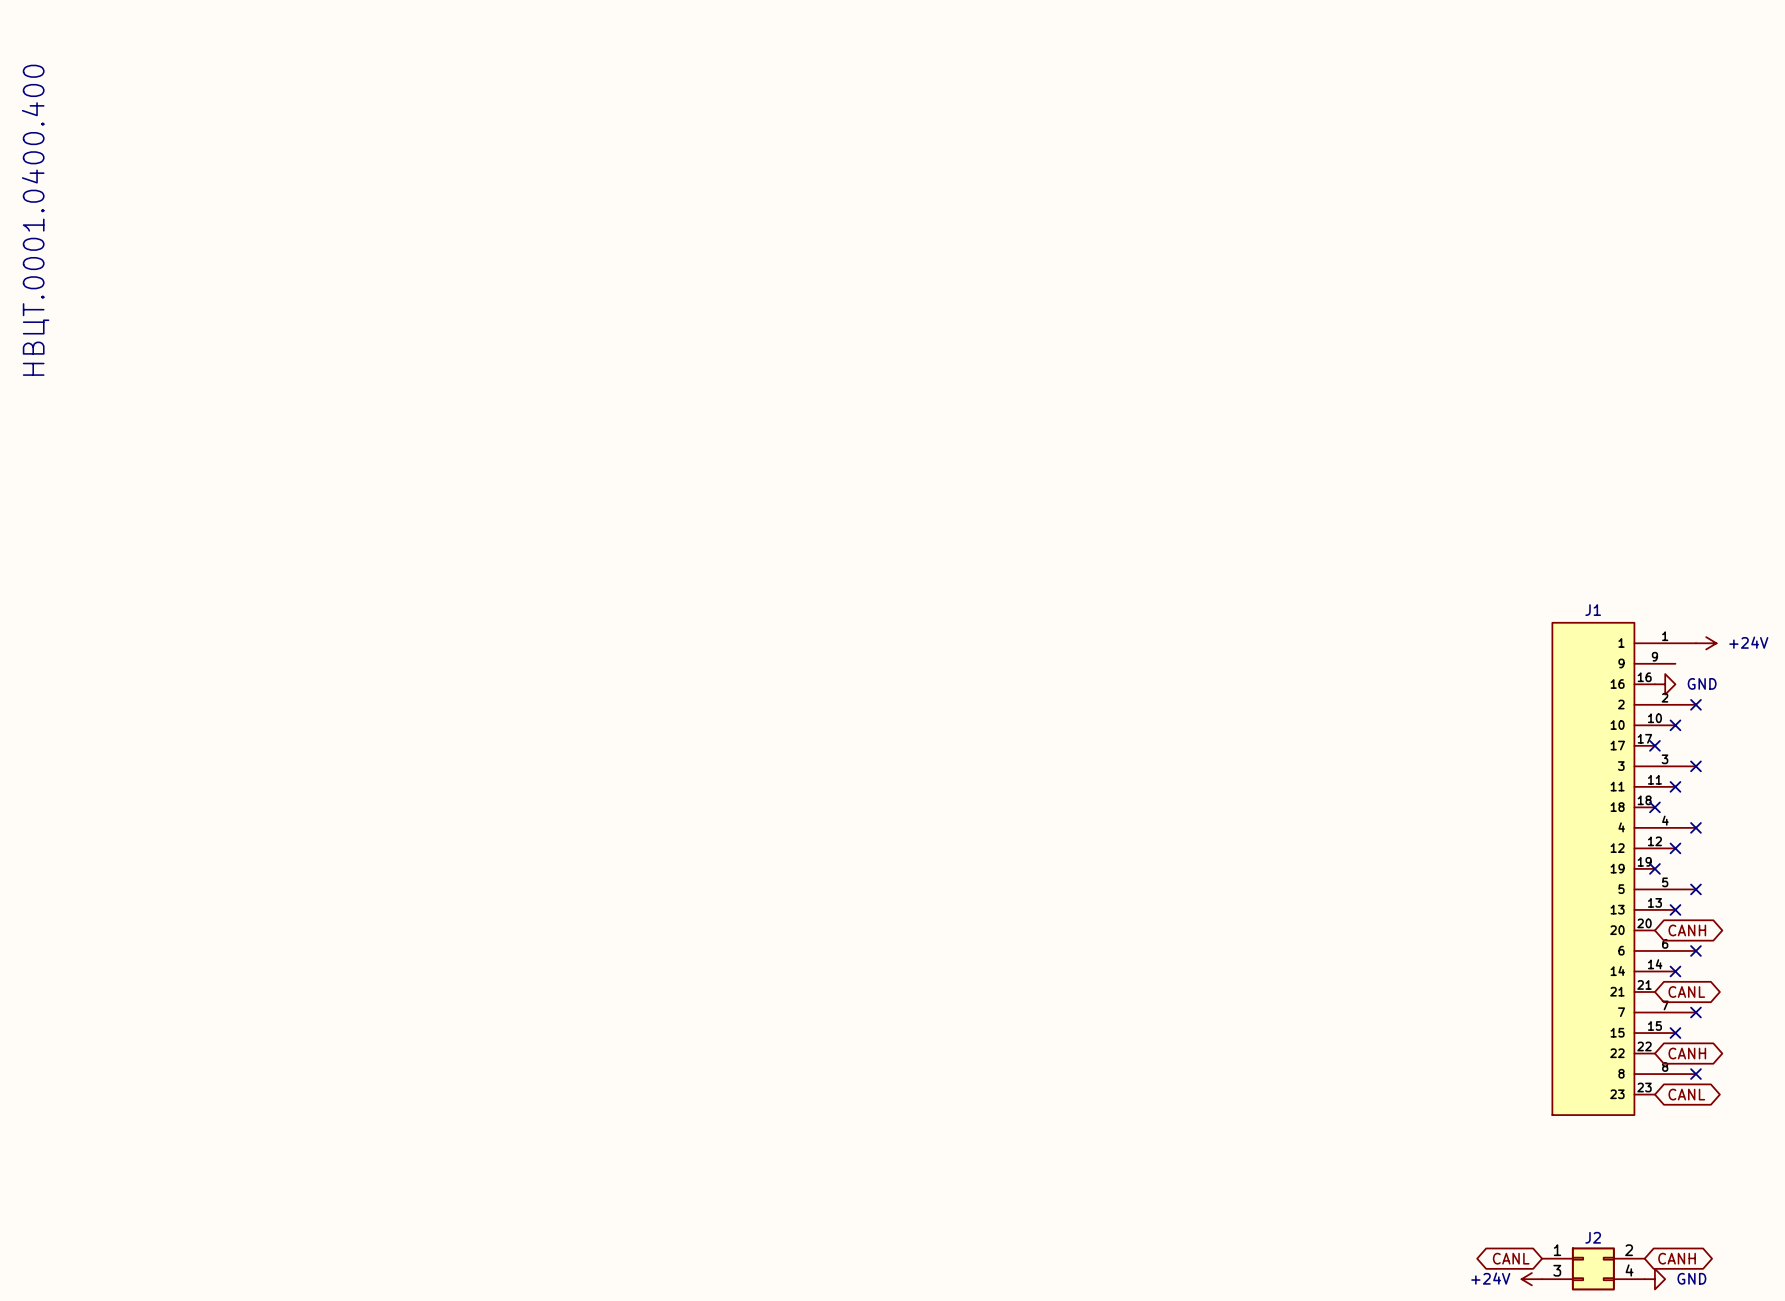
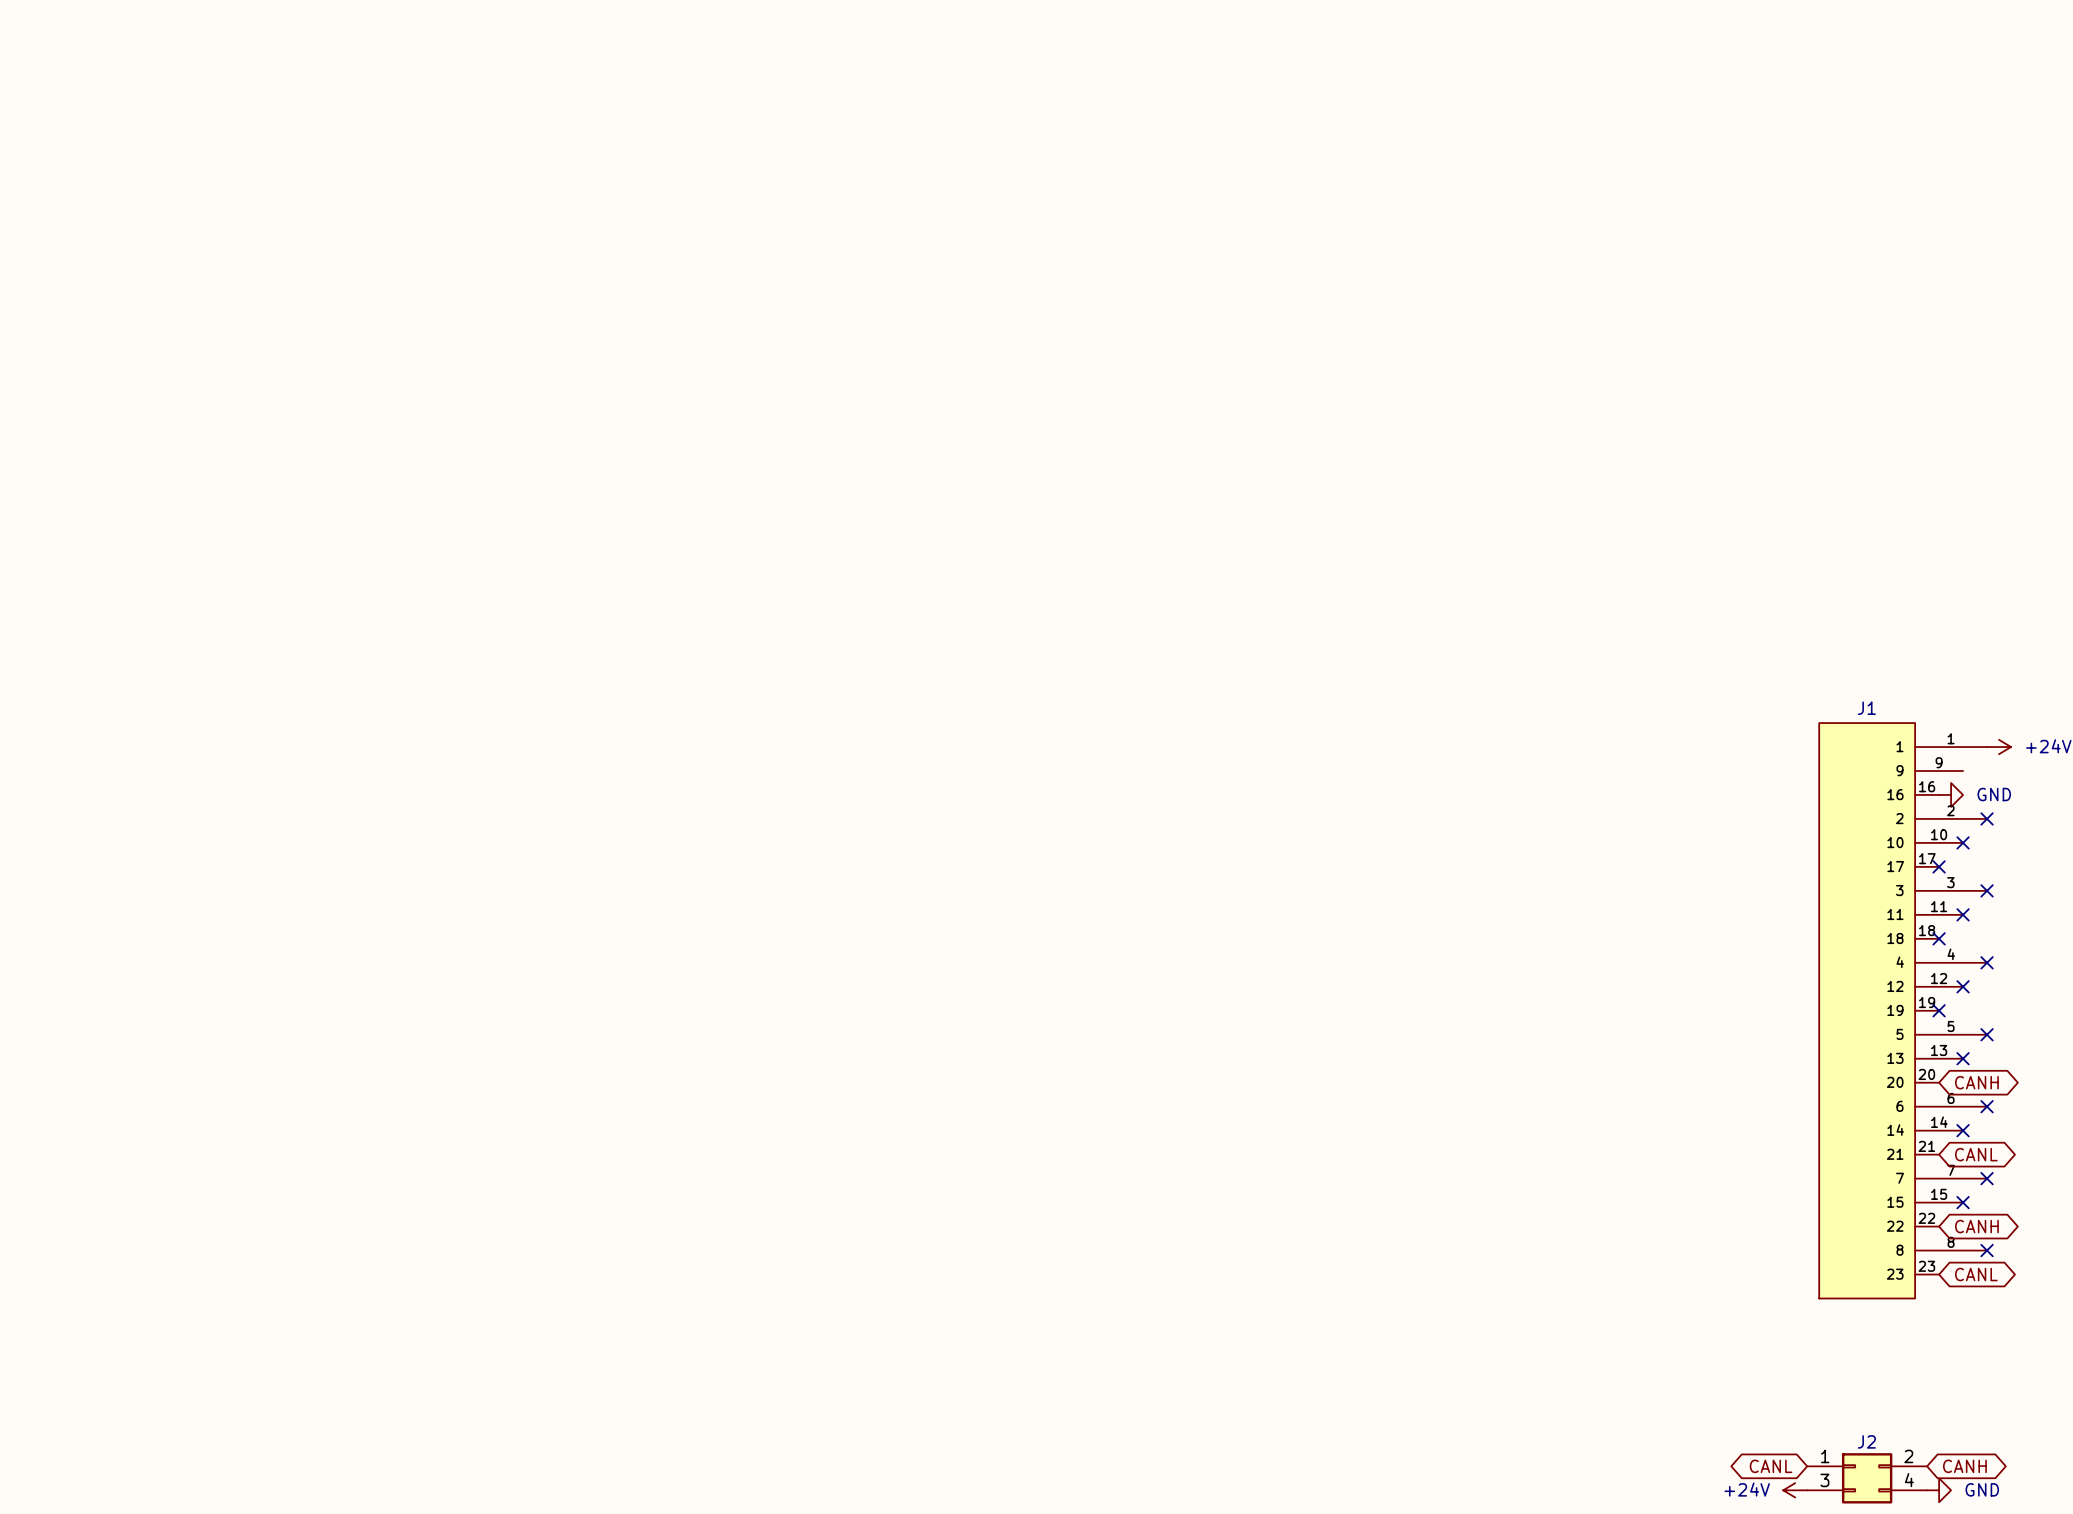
text: НВЦТ.0001.0400.400 (35, 220) -> none

